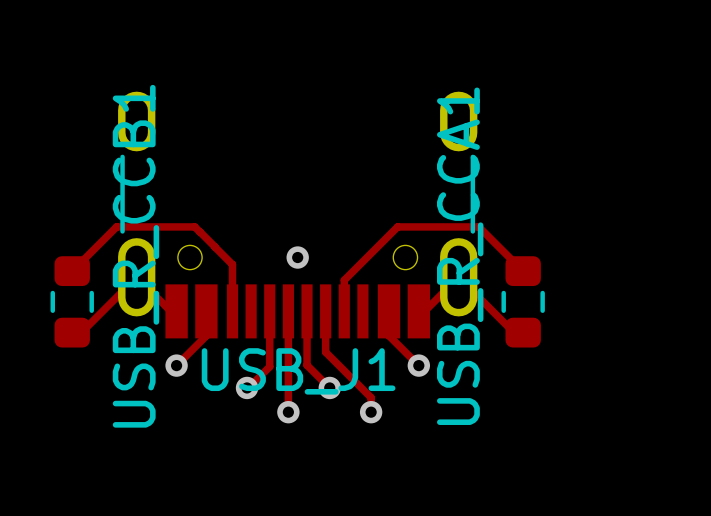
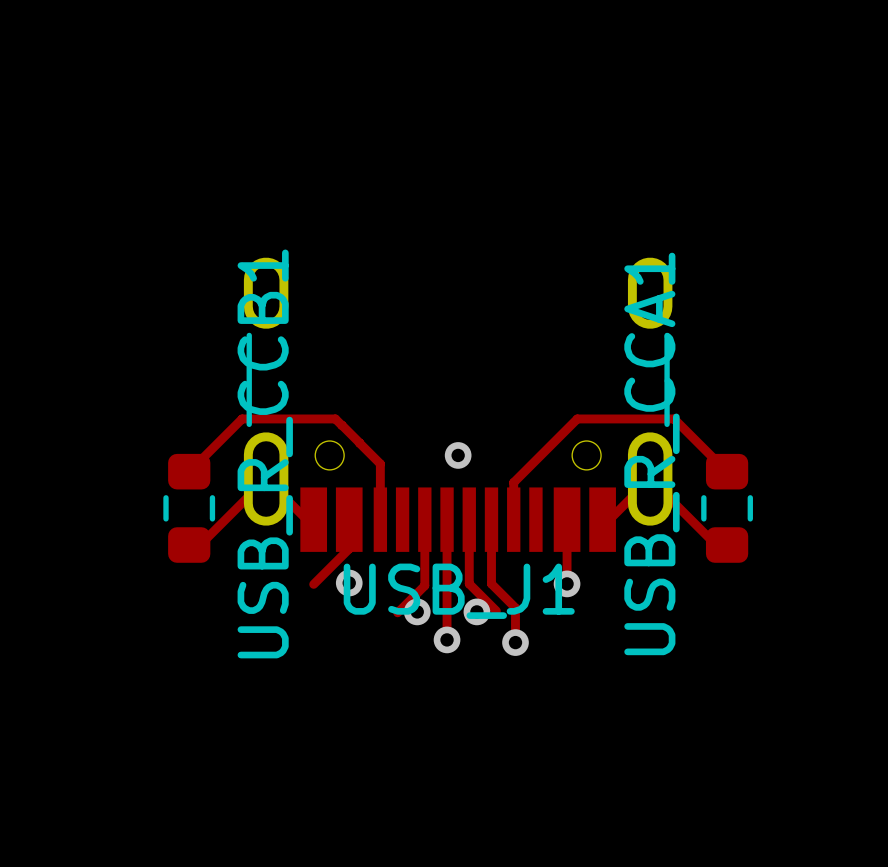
track: (389, 335) (418, 365) -> (567, 548) (567, 583)
track: (325, 352) (371, 397) (371, 412) -> (491, 568) (491, 583) (515, 608)
via: none -> (349, 583)
via: (176, 365) -> none
via: none -> (567, 583)
via: (418, 365) -> none
track: none -> (515, 608) (515, 642)
via position: (247, 387) -> (417, 611)
via position: (329, 387) -> (476, 611)
via: (371, 412) -> none
via: none -> (515, 642)

